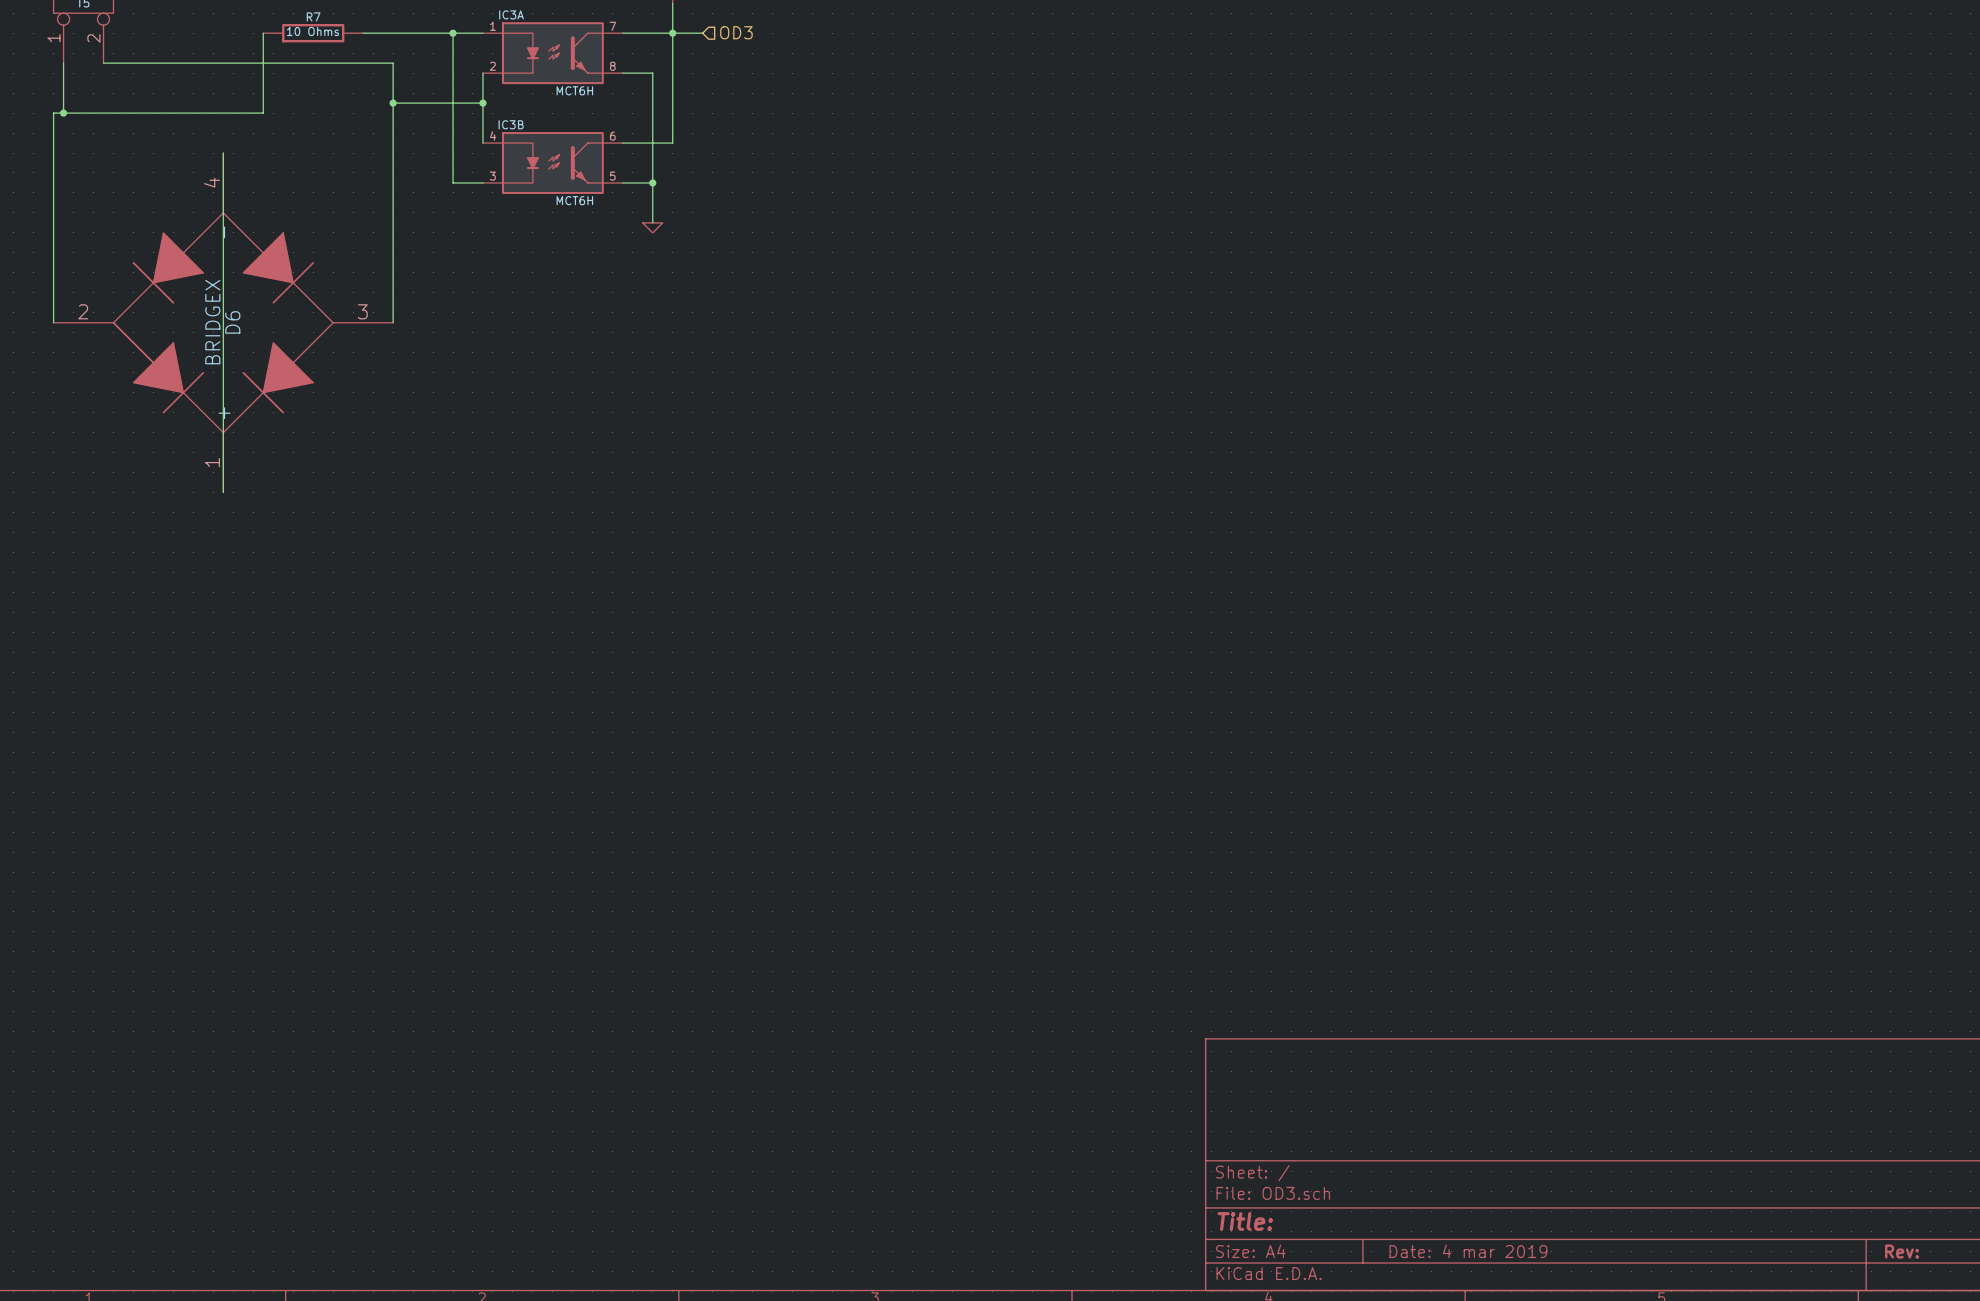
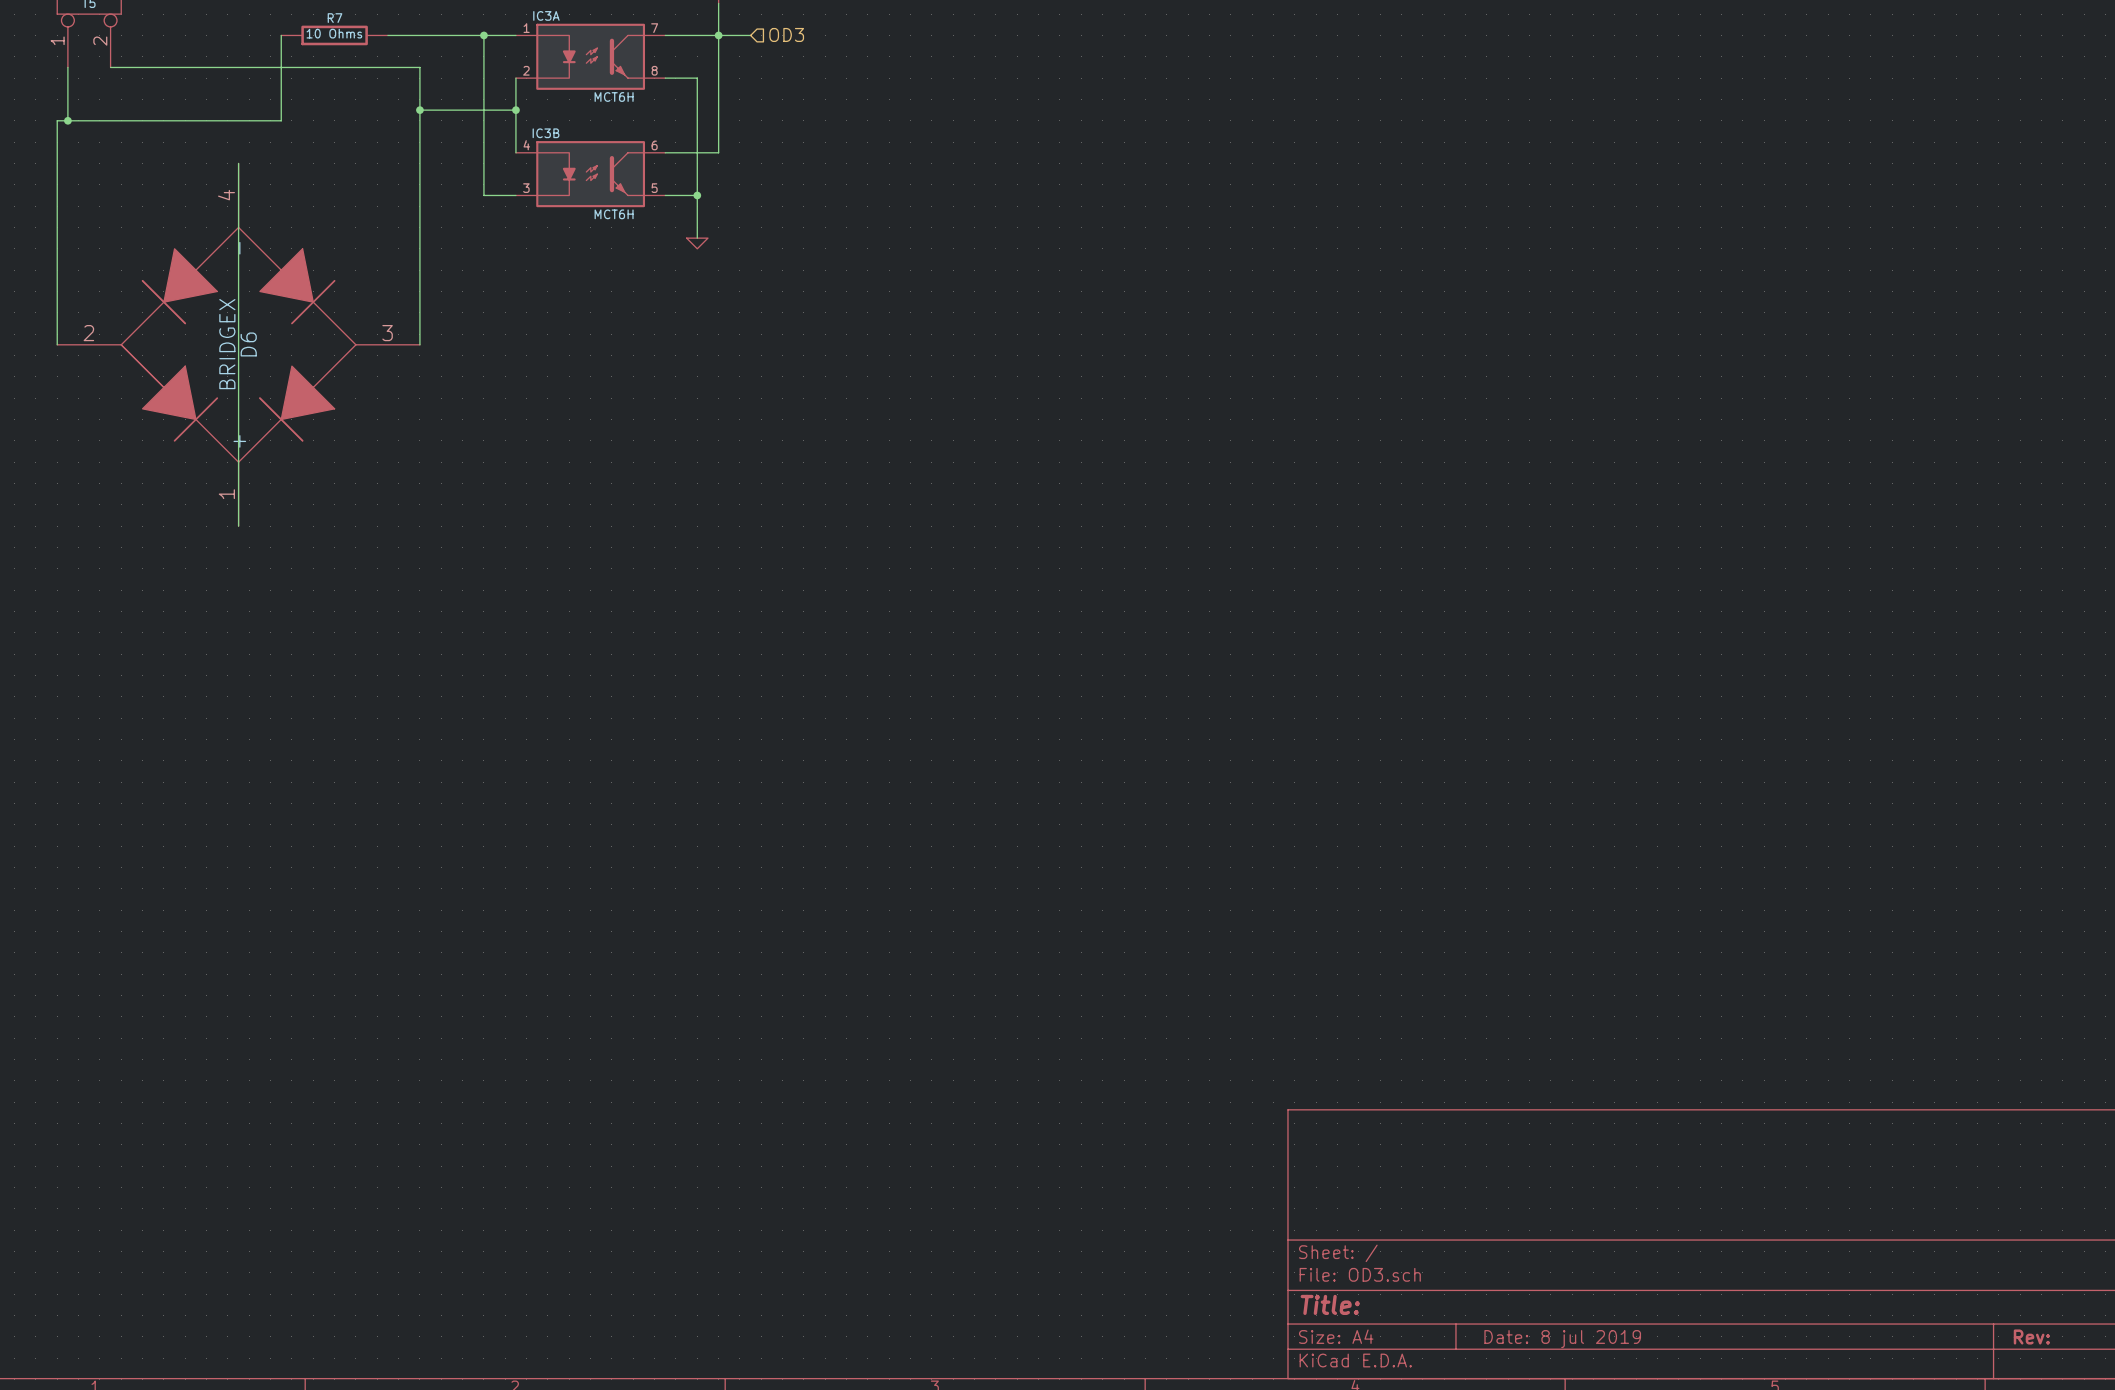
title block: Date: 4 mar 2019 (1468, 1251) -> Date: 8 jul 2019 (1562, 1339)

